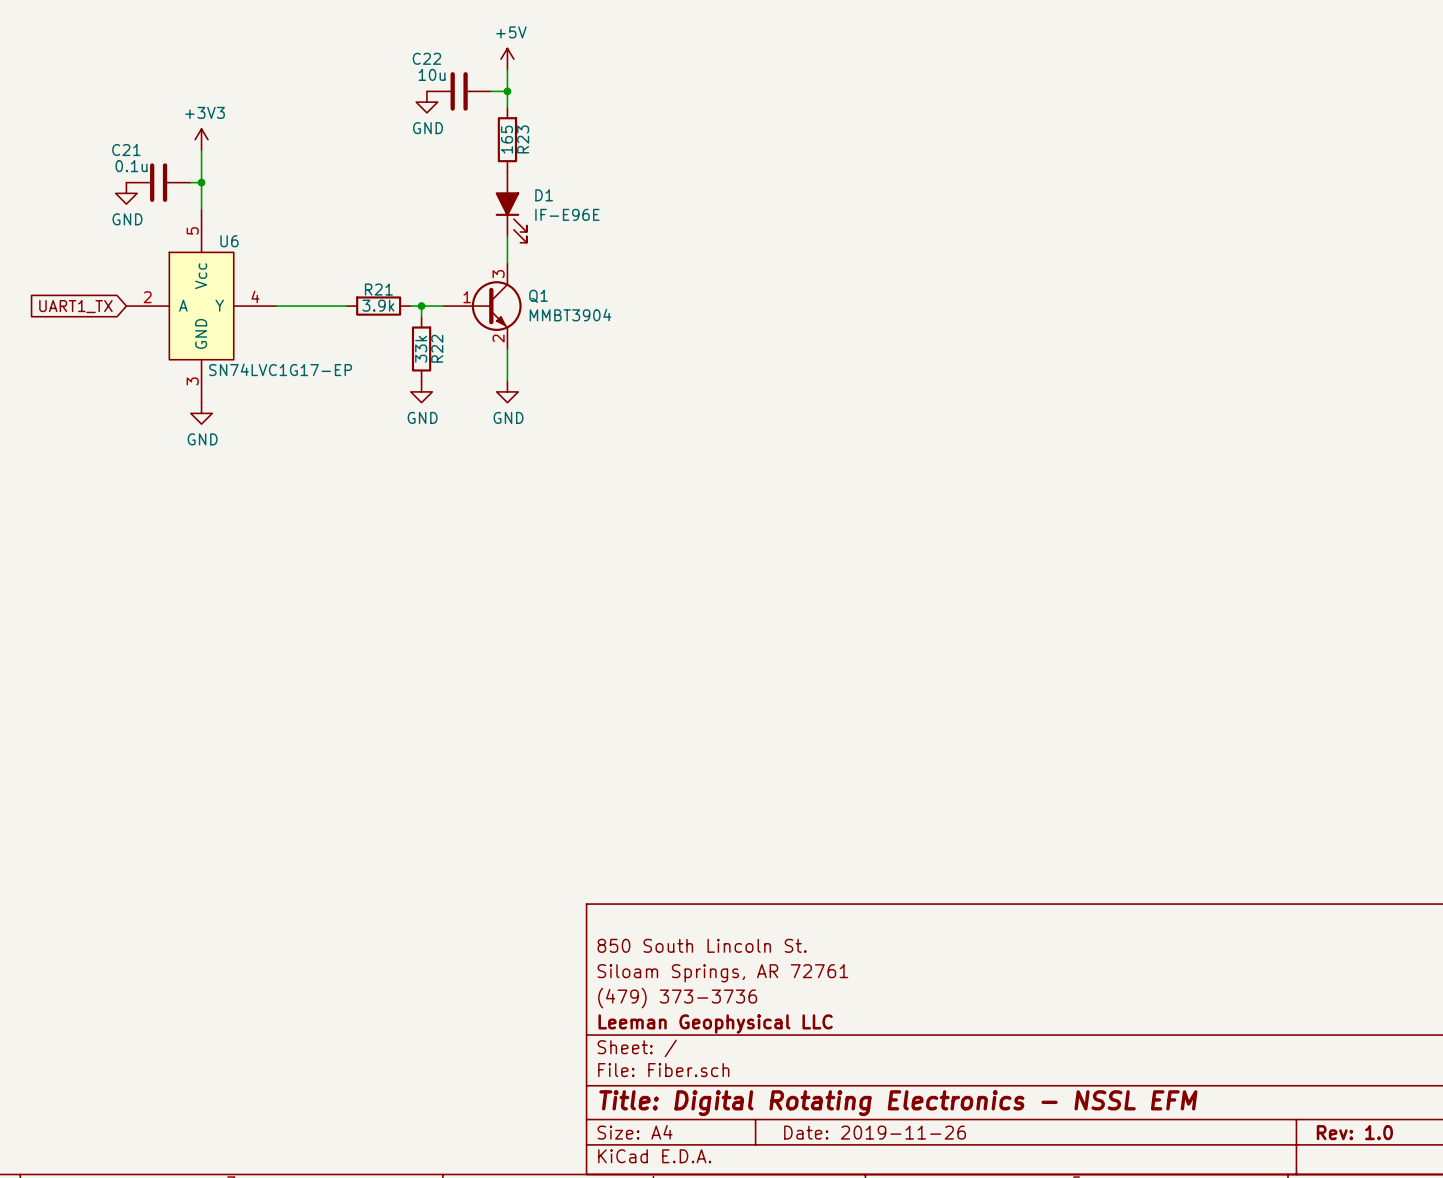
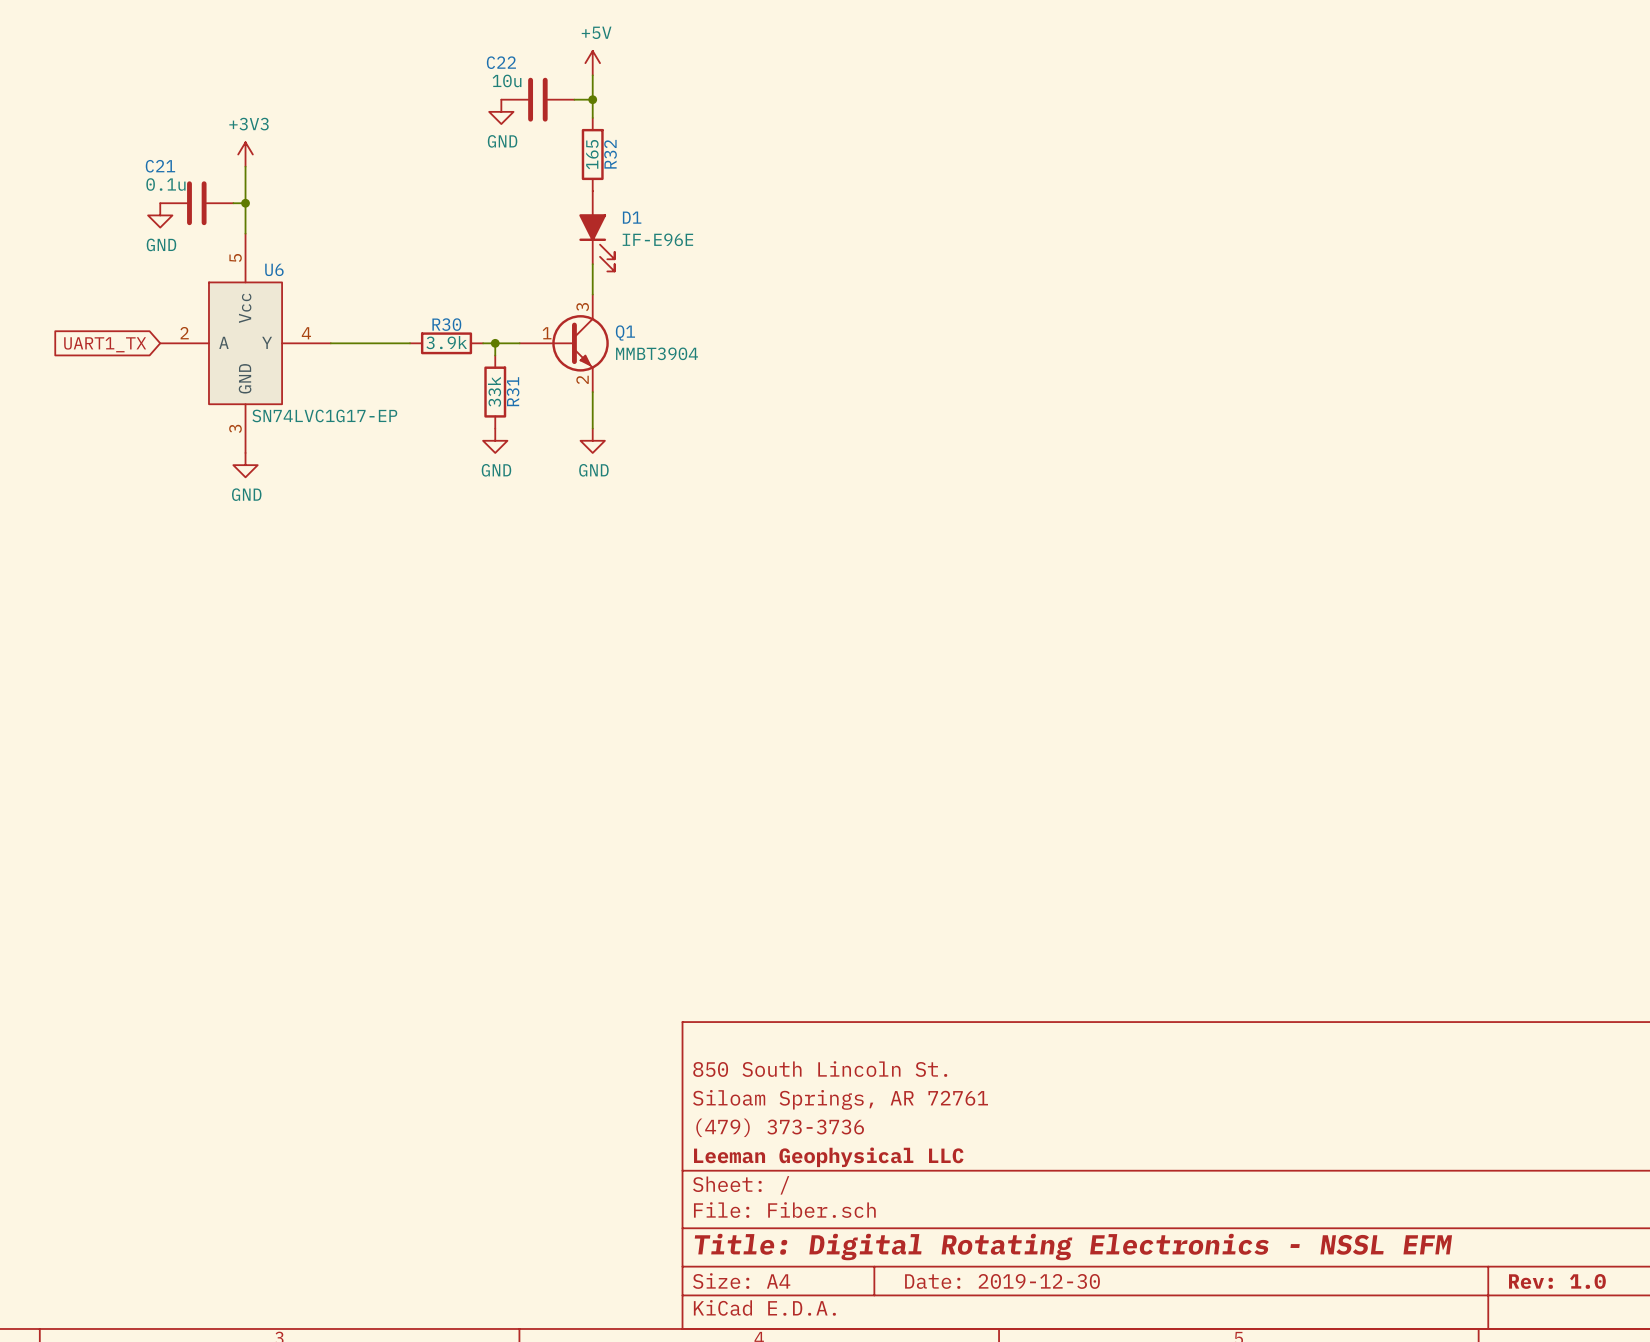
R23 name: R23 (523, 139) -> R32 (610, 154)
R21 name: R21 (378, 289) -> R30 (446, 324)
R22 name: R22 (437, 348) -> R31 (513, 391)
title block: Date: 2019-11-26 (875, 1132) -> Date: 2019-12-30 (1002, 1281)

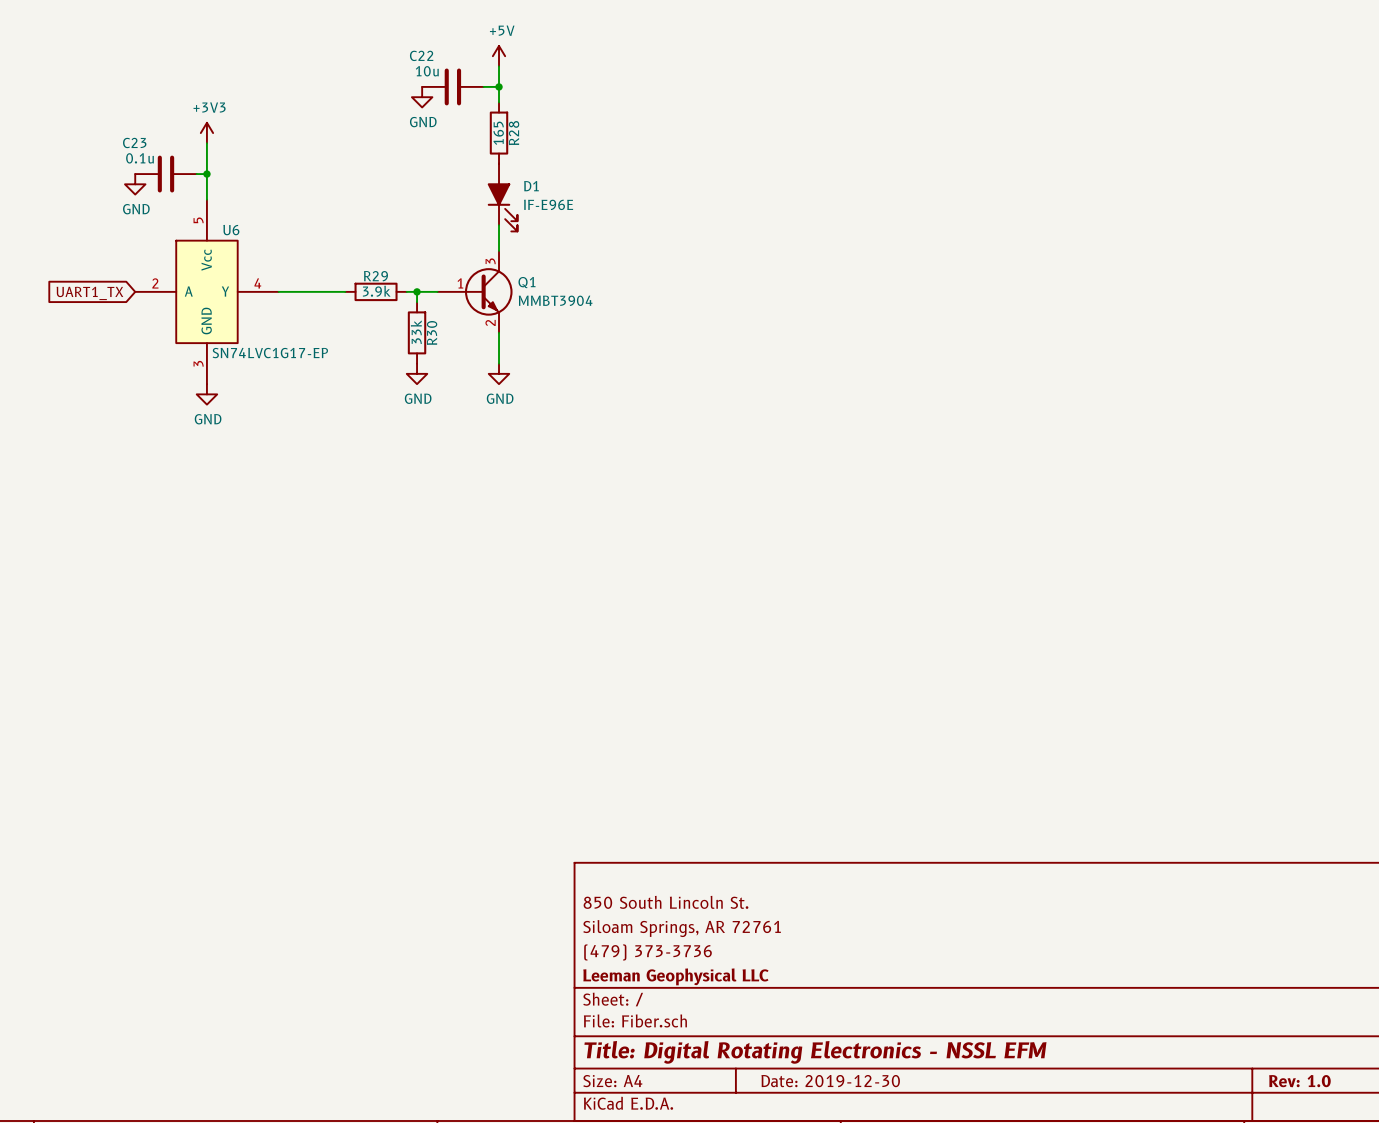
R32 name: R32 (610, 154) -> R28 (514, 133)
C21 name: C21 (160, 166) -> C23 (134, 142)
R30 name: R30 (446, 324) -> R29 (375, 276)
R31 name: R31 (513, 391) -> R30 (432, 333)

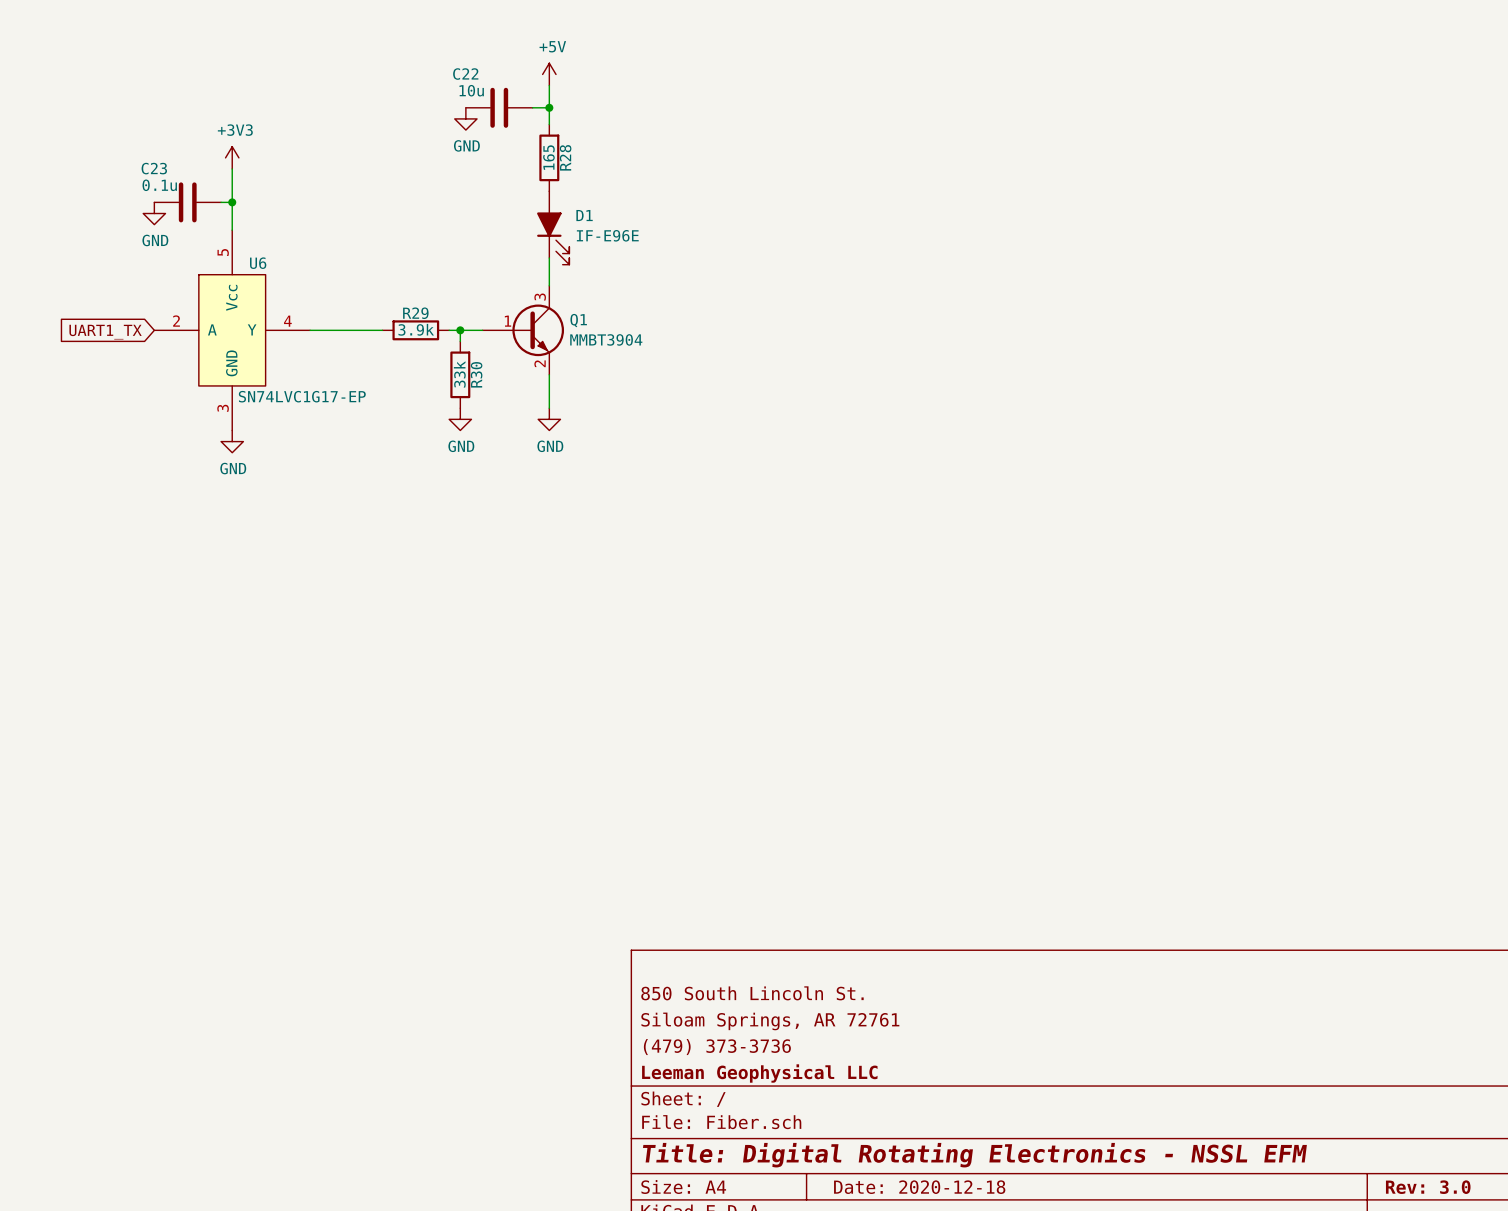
title block: Date: 2019-12-30 (830, 1081) -> Date: 2020-12-18 (919, 1187)
title block: Rev: 1.0 (1299, 1081) -> Rev: 3.0 (1428, 1187)

